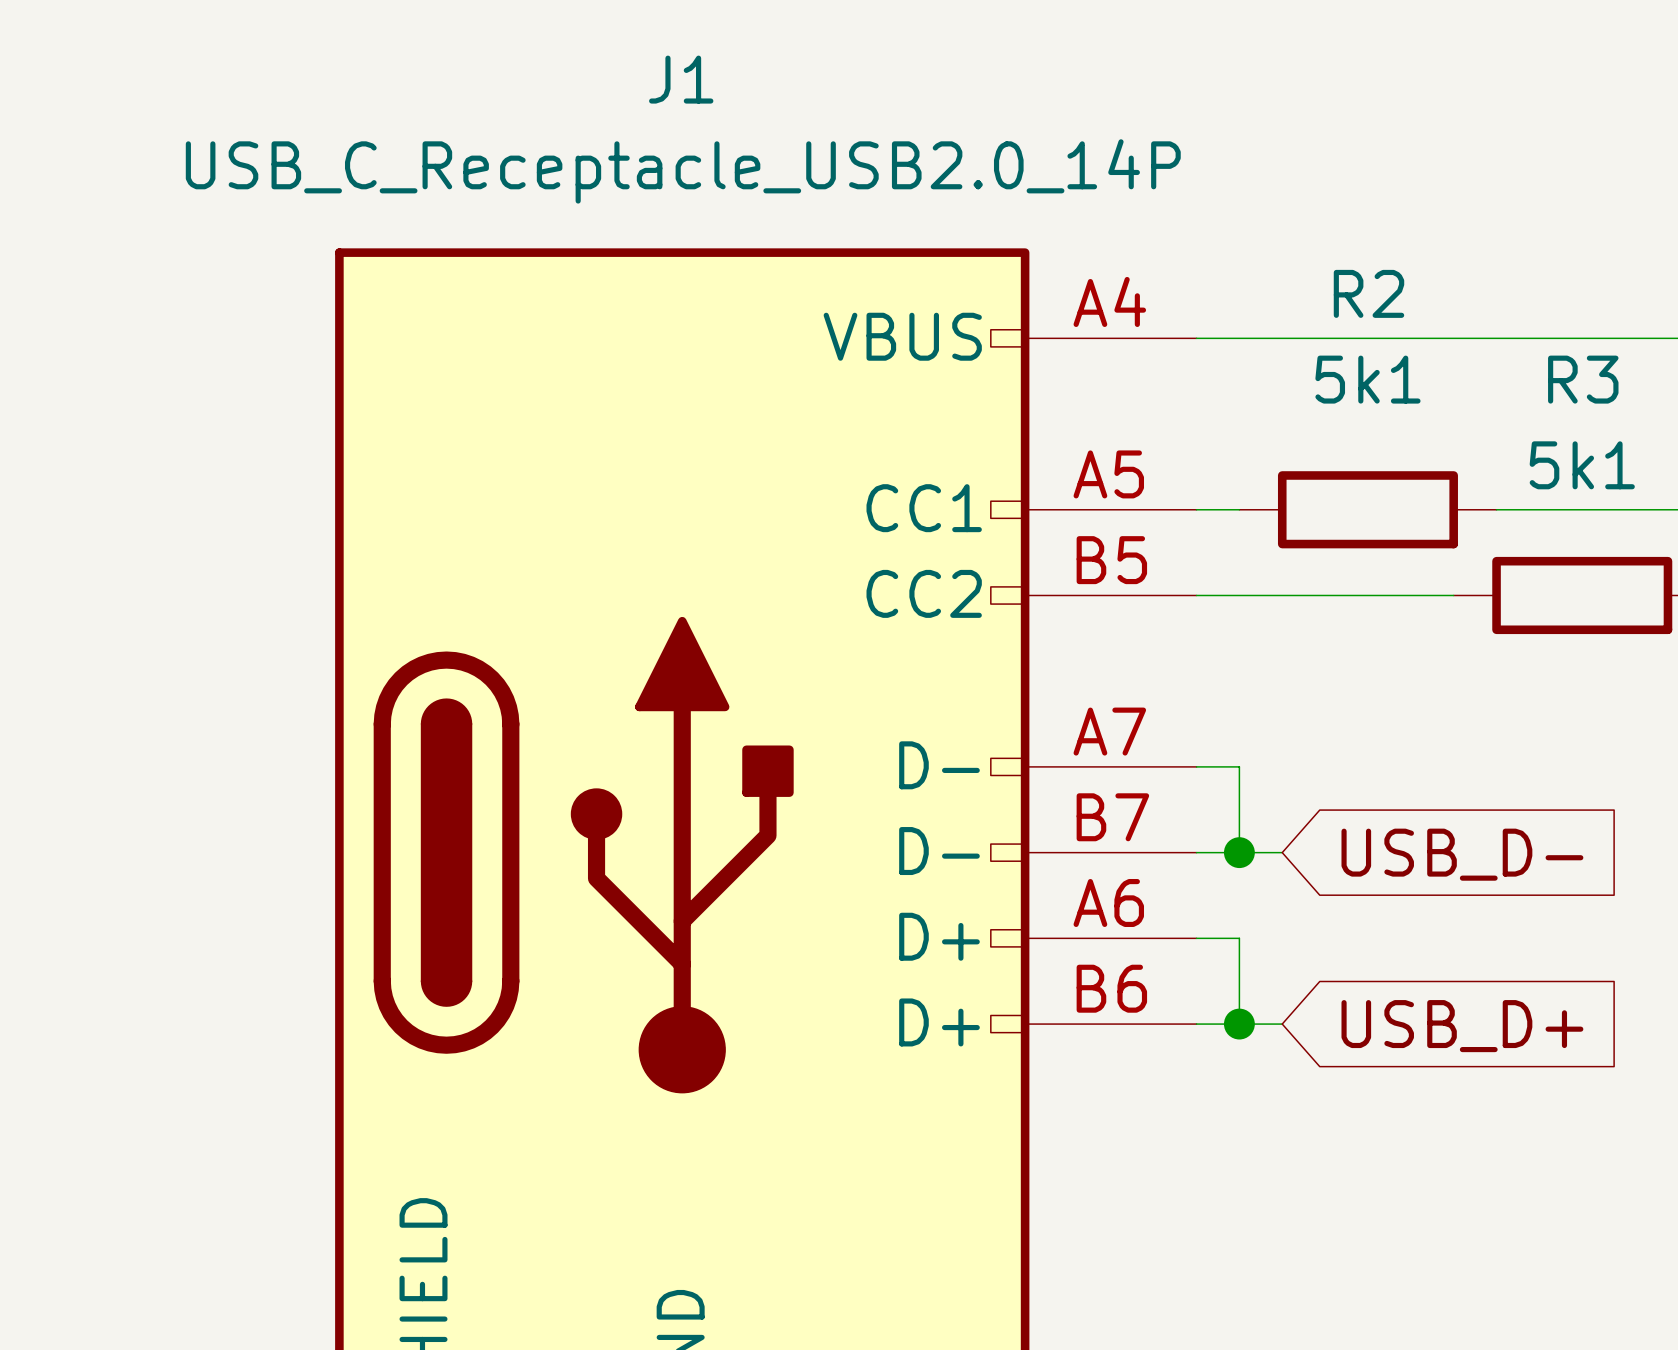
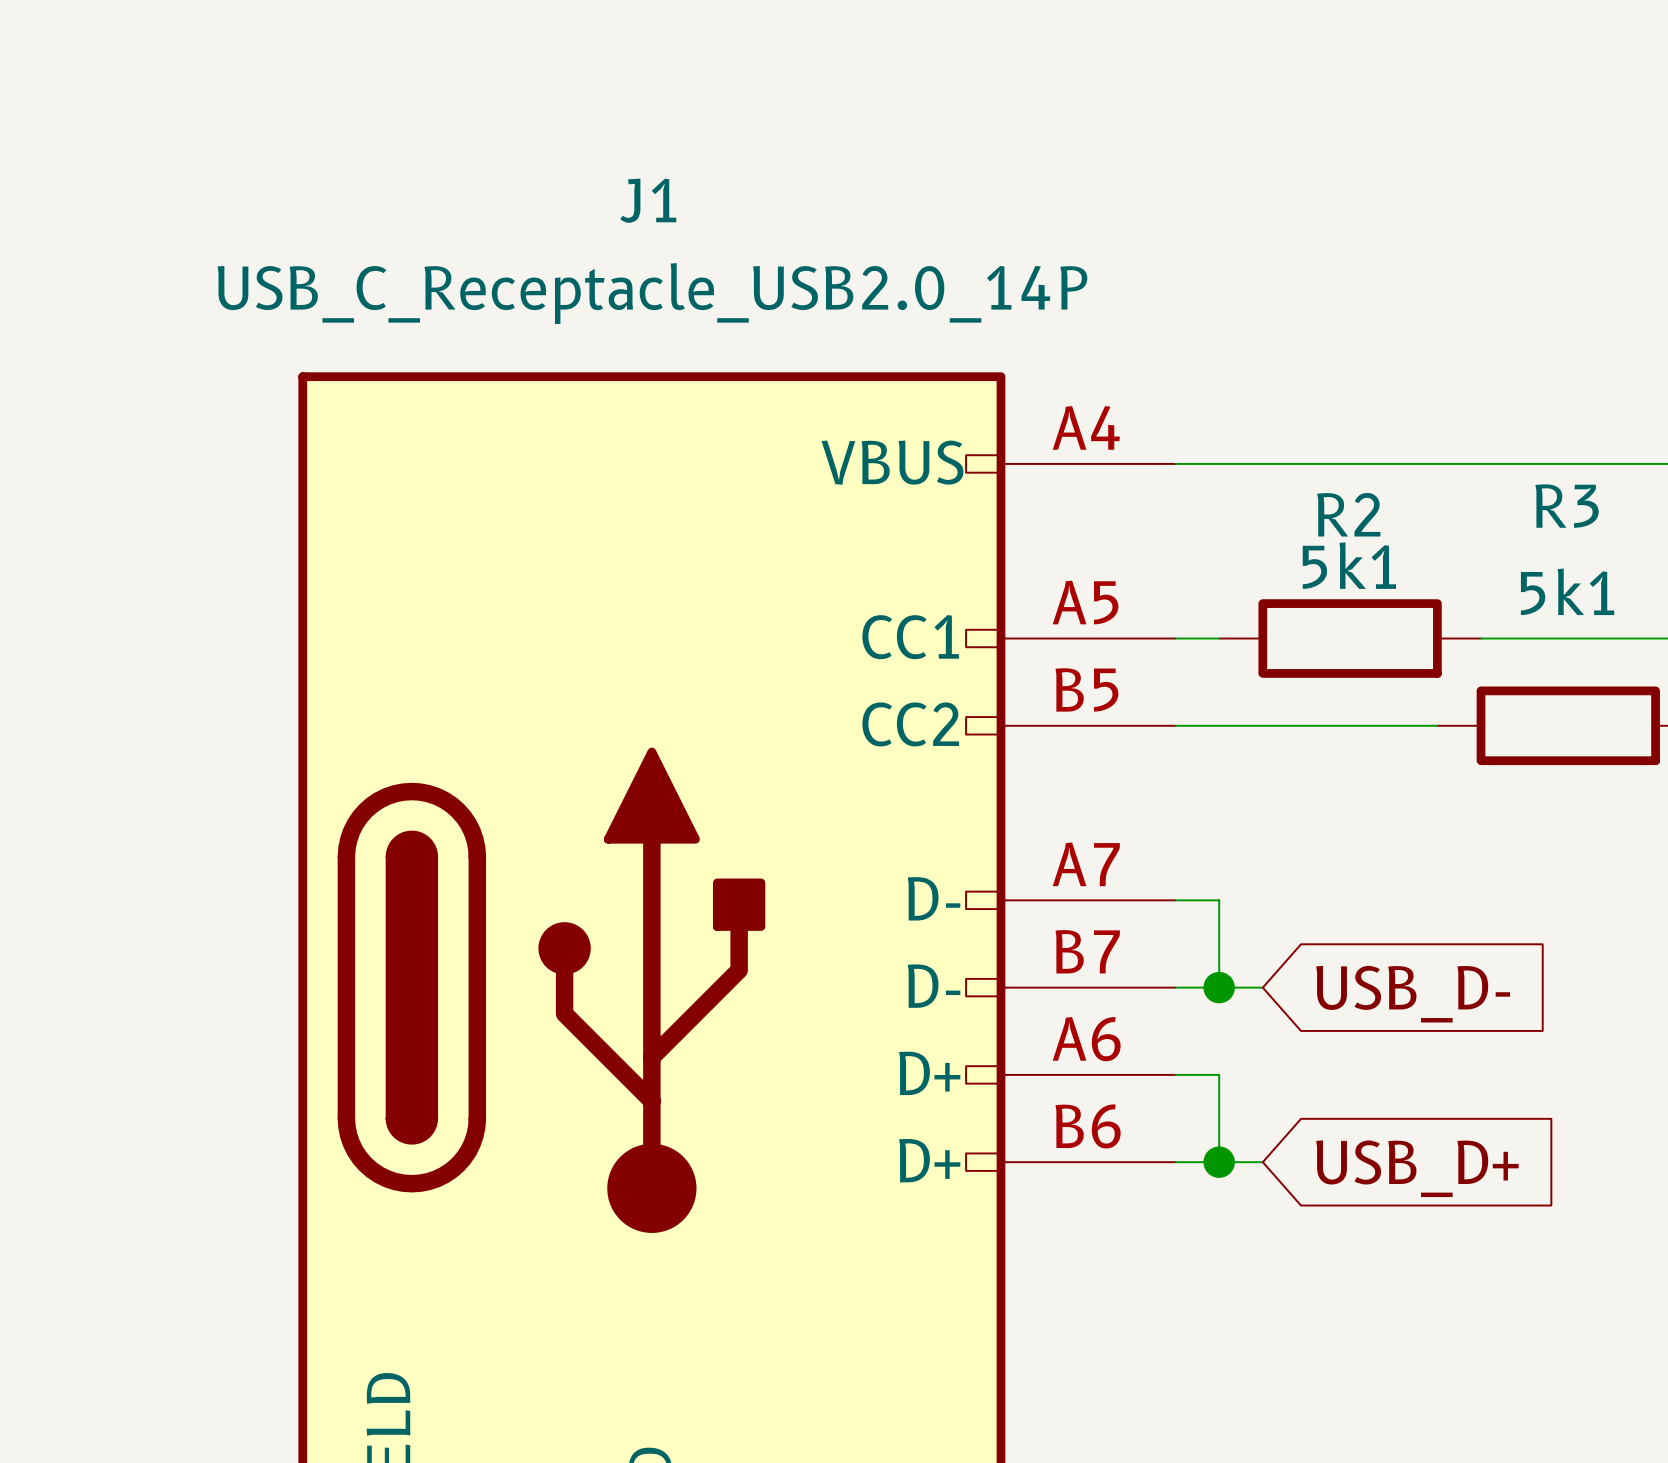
R2 name position: R2 (1368, 293) -> R2 (1348, 514)
R2 value position: 5k1 (1367, 379) -> 5k1 (1349, 565)

